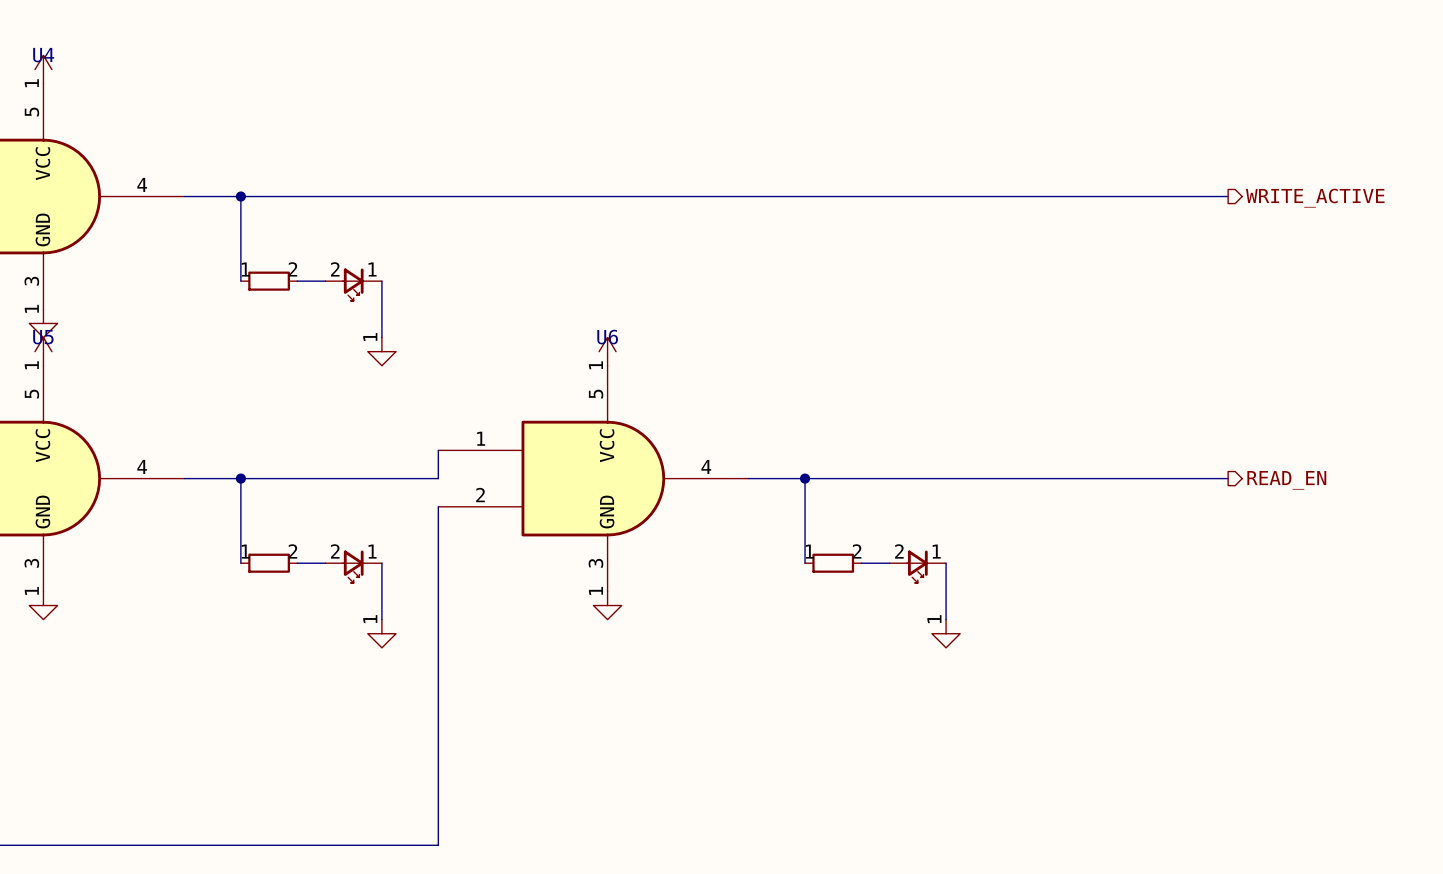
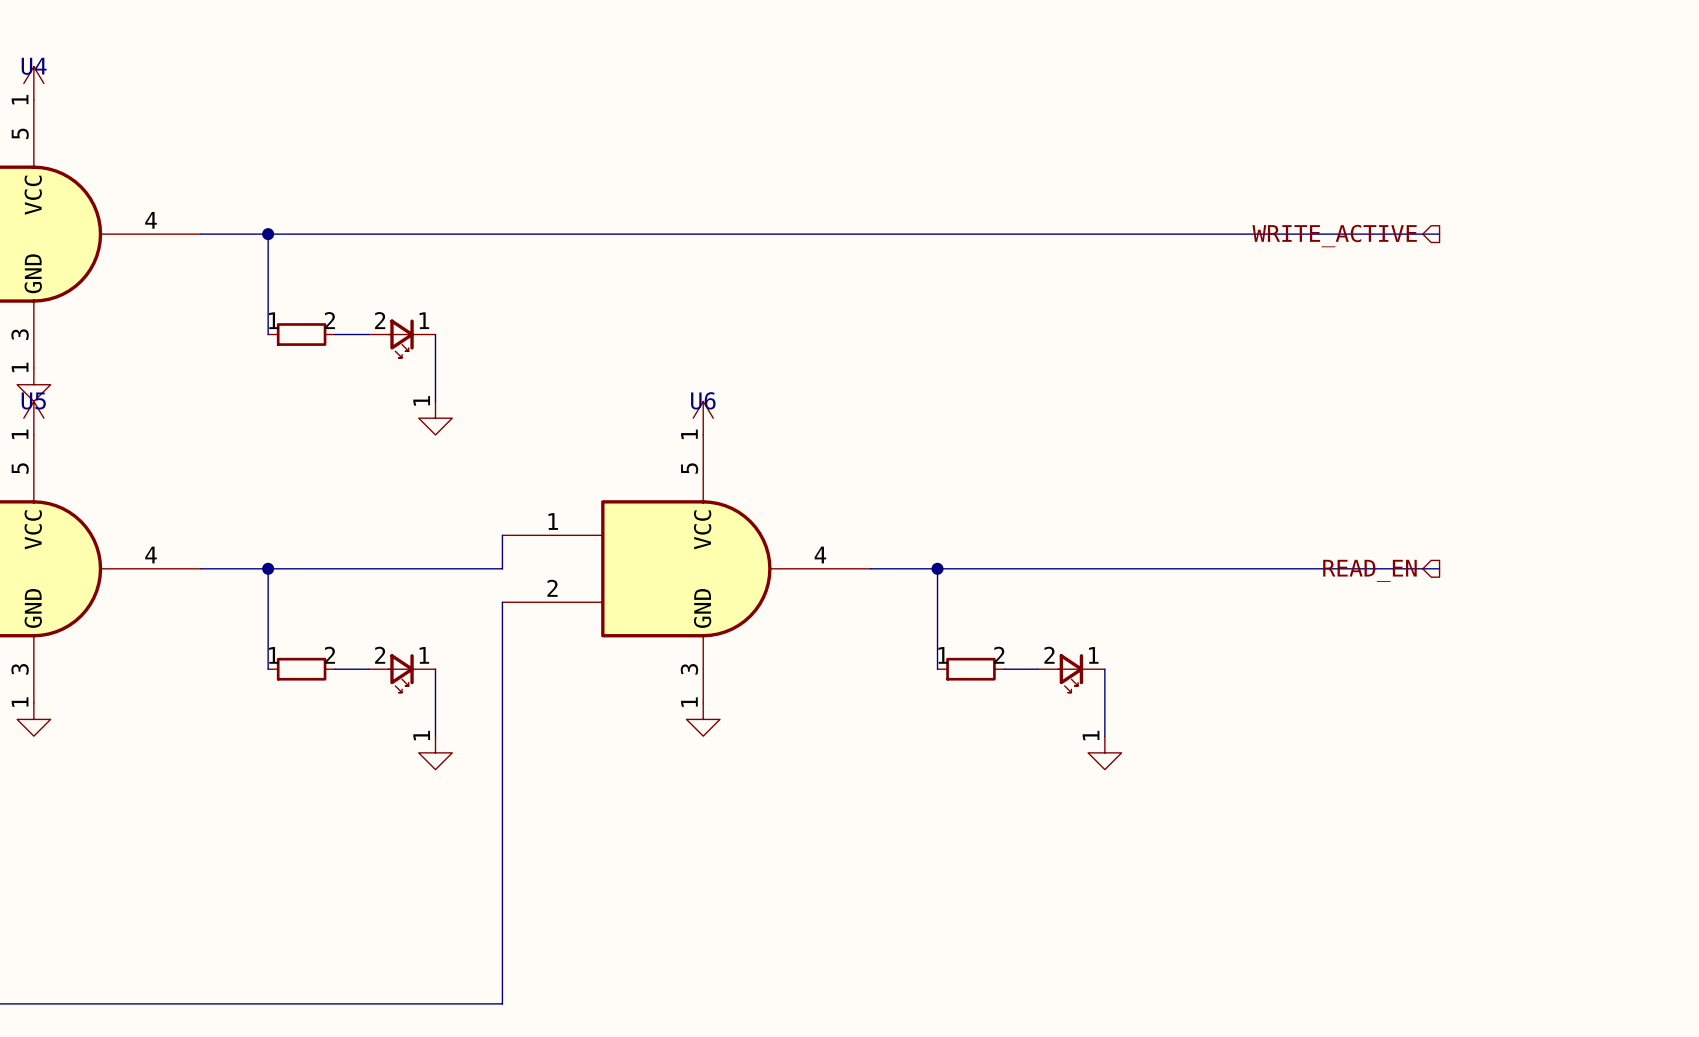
hierarchical label rotation: 0° (1315, 198) -> 180° (1334, 236)
hierarchical label position: WRITE_ACTIVE (1315, 198) -> WRITE_ACTIVE (1334, 236)
hierarchical label rotation: 0° (1286, 480) -> 180° (1369, 570)
hierarchical label position: READ_EN (1286, 480) -> READ_EN (1369, 570)

